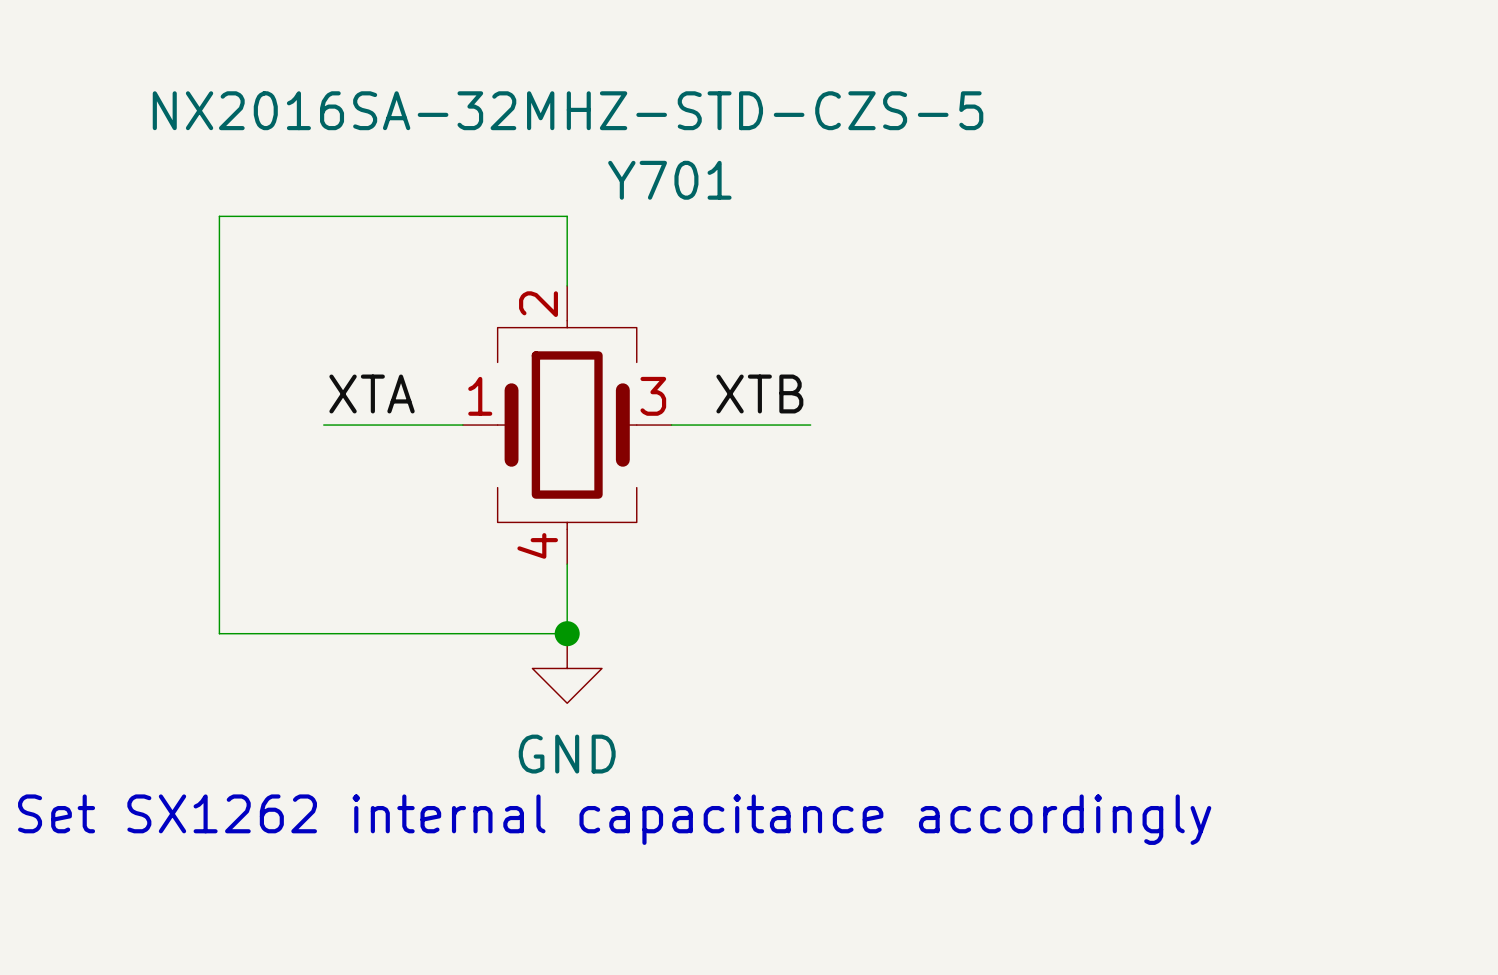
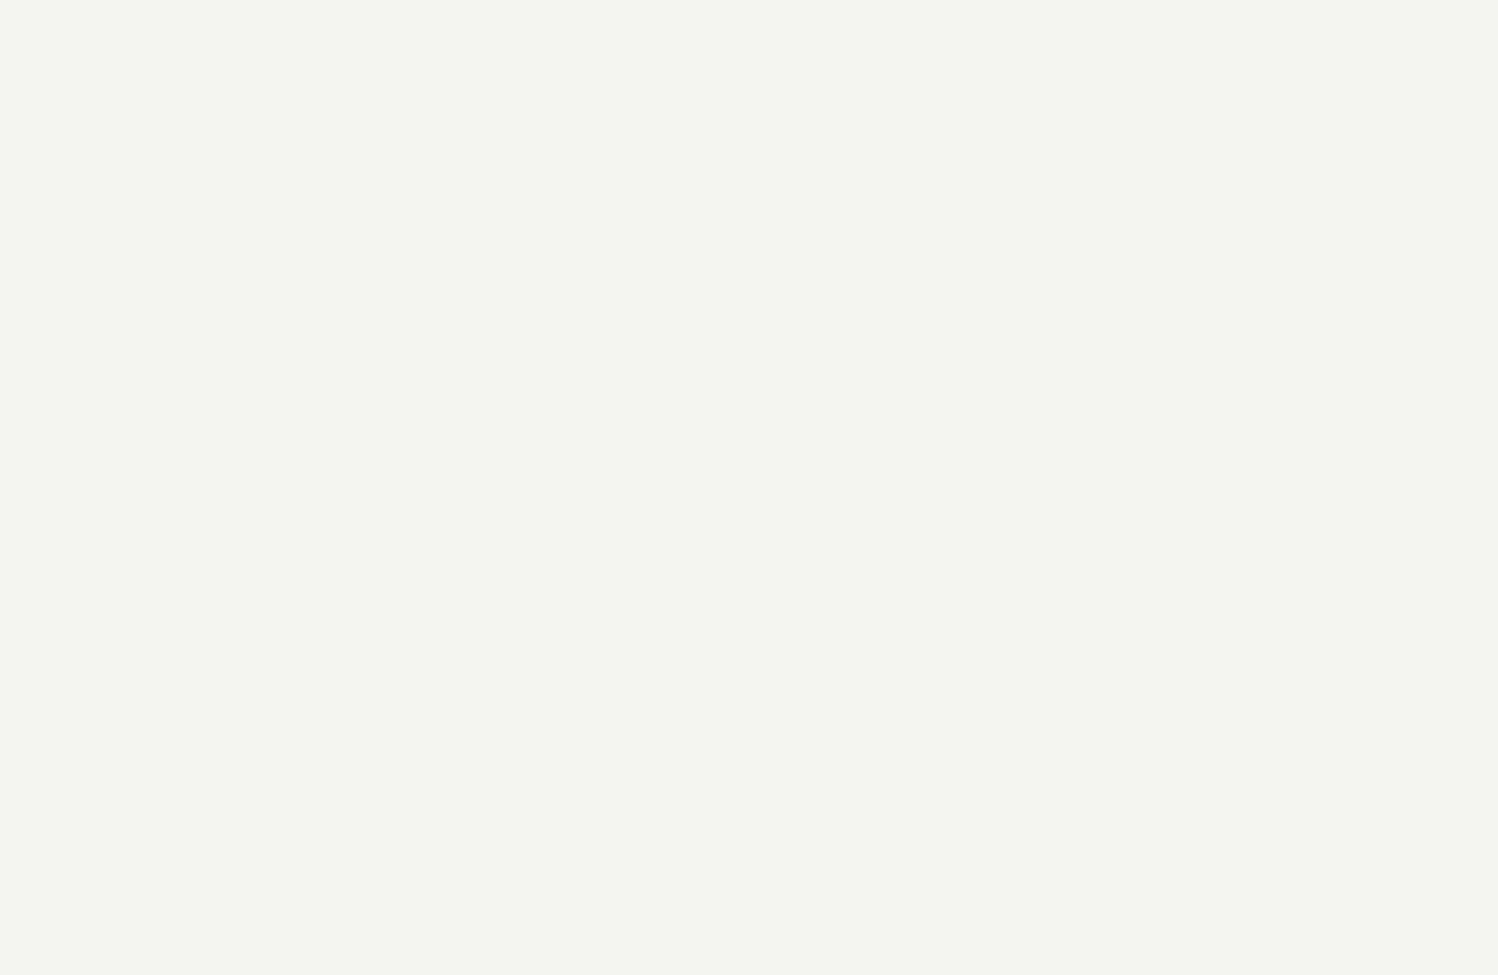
wire: (567, 285) (567, 216) (219, 216) (219, 633) (567, 633) (567, 564) -> none
label: XTA (372, 393) -> none
label: XTB (759, 393) -> none
wire: (323, 425) (462, 425) -> none
Y701: NX2016SA-32MHZ-STD-CZS-5 (567, 425) -> none
wire: (671, 425) (810, 425) -> none
junction: (567, 633) -> none
power symbol: GND (567, 668) -> none
text: Set SX1262 internal capacitance accordingly (614, 819) -> none

